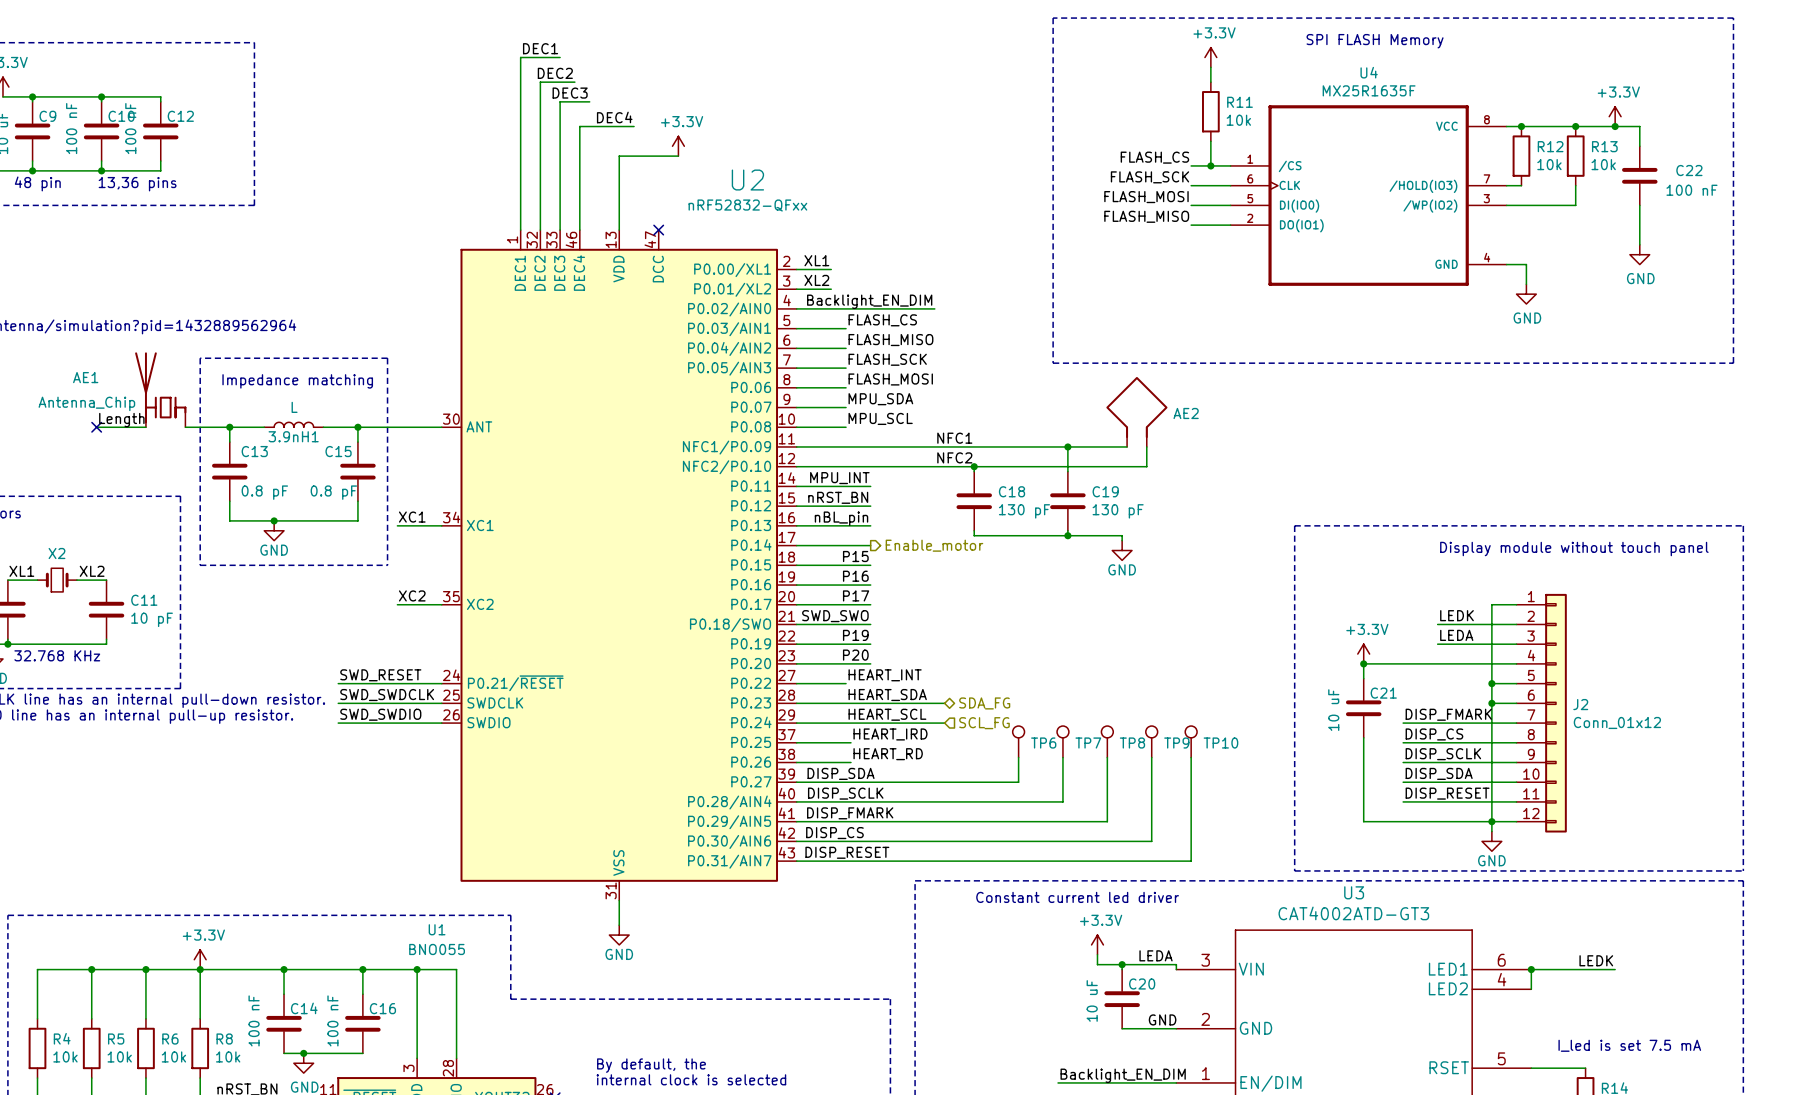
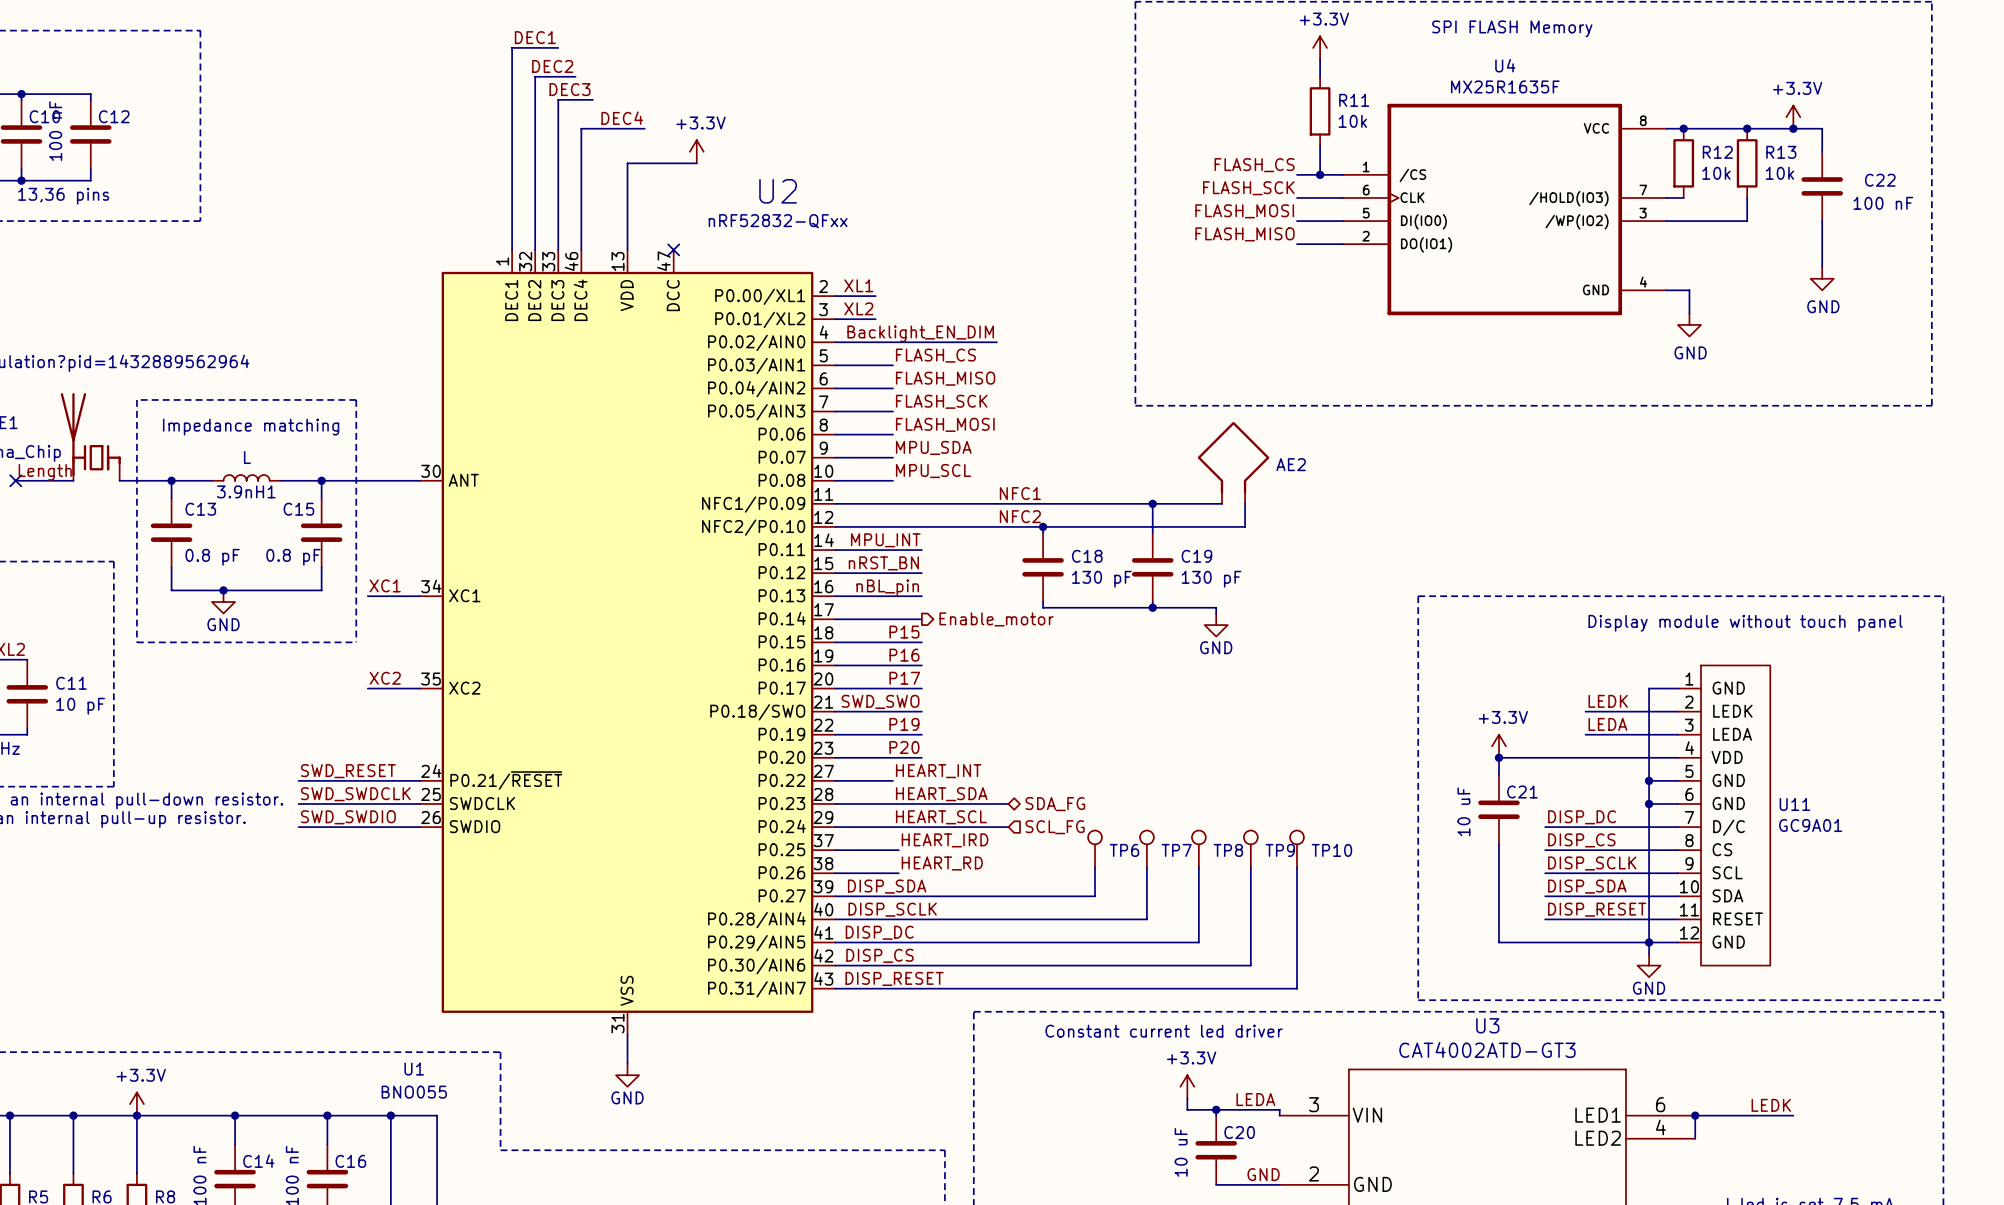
J2: Conn_01x12 (1541, 713) -> none
U11: none -> GC9A01 (1724, 815)
label: DISP_FMARK (1448, 714) -> DISP_DC (1582, 817)
label: none -> DISP_DC (879, 932)
label: DISP_FMARK (850, 813) -> none

